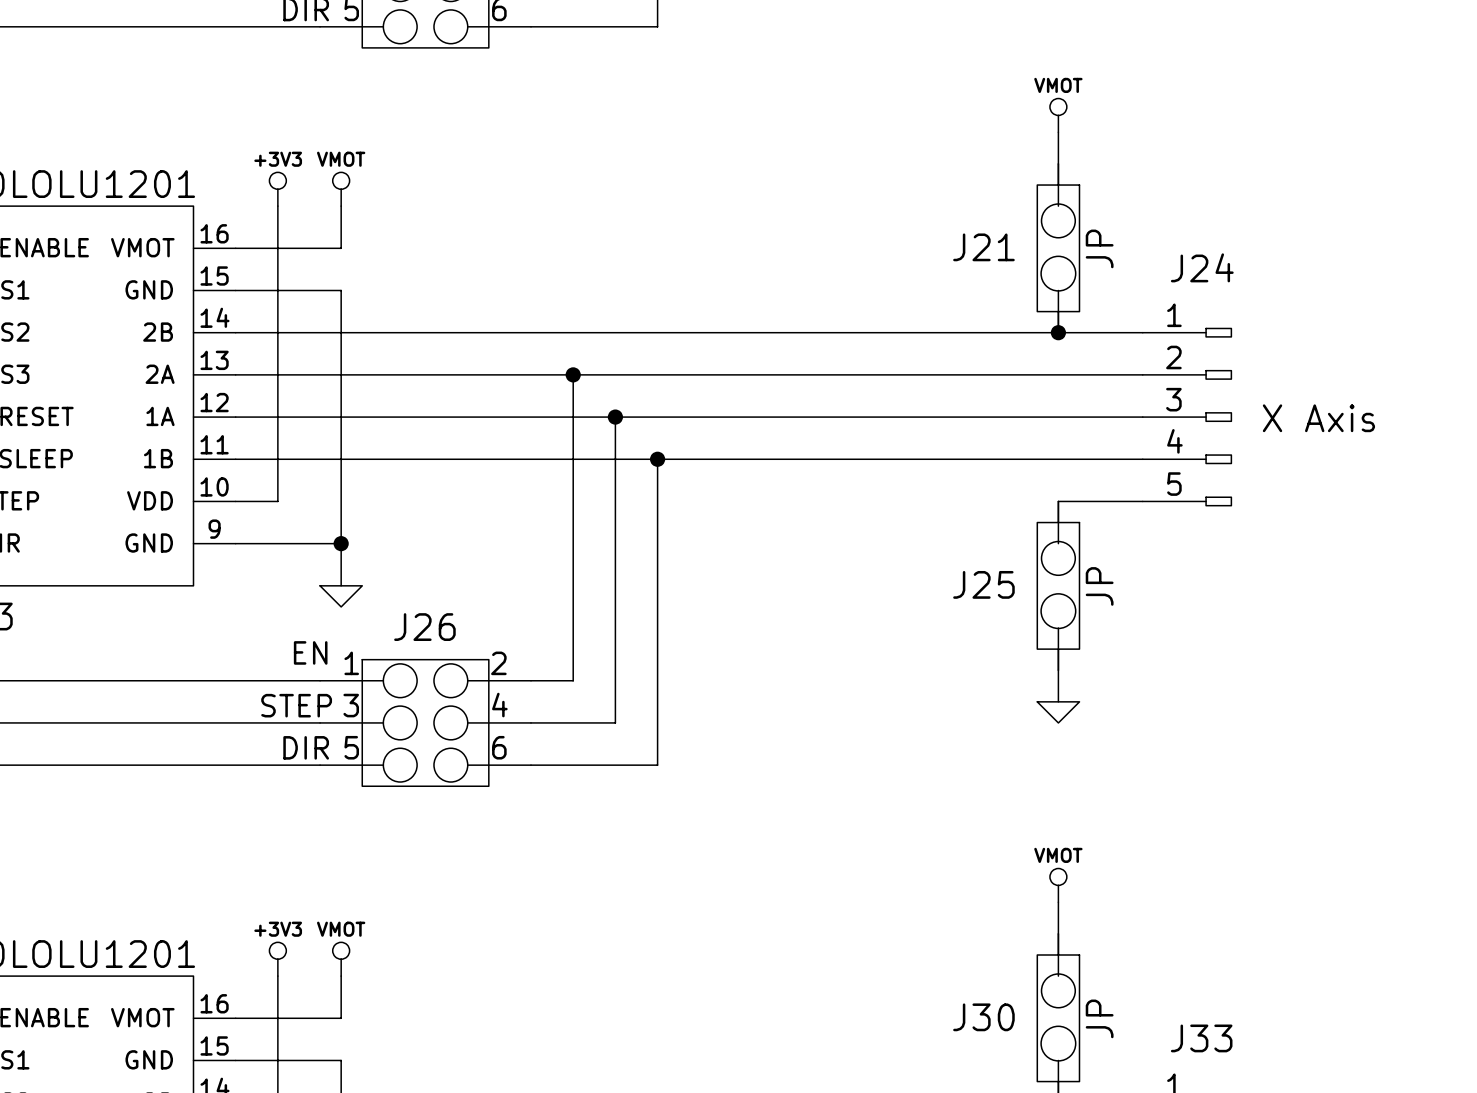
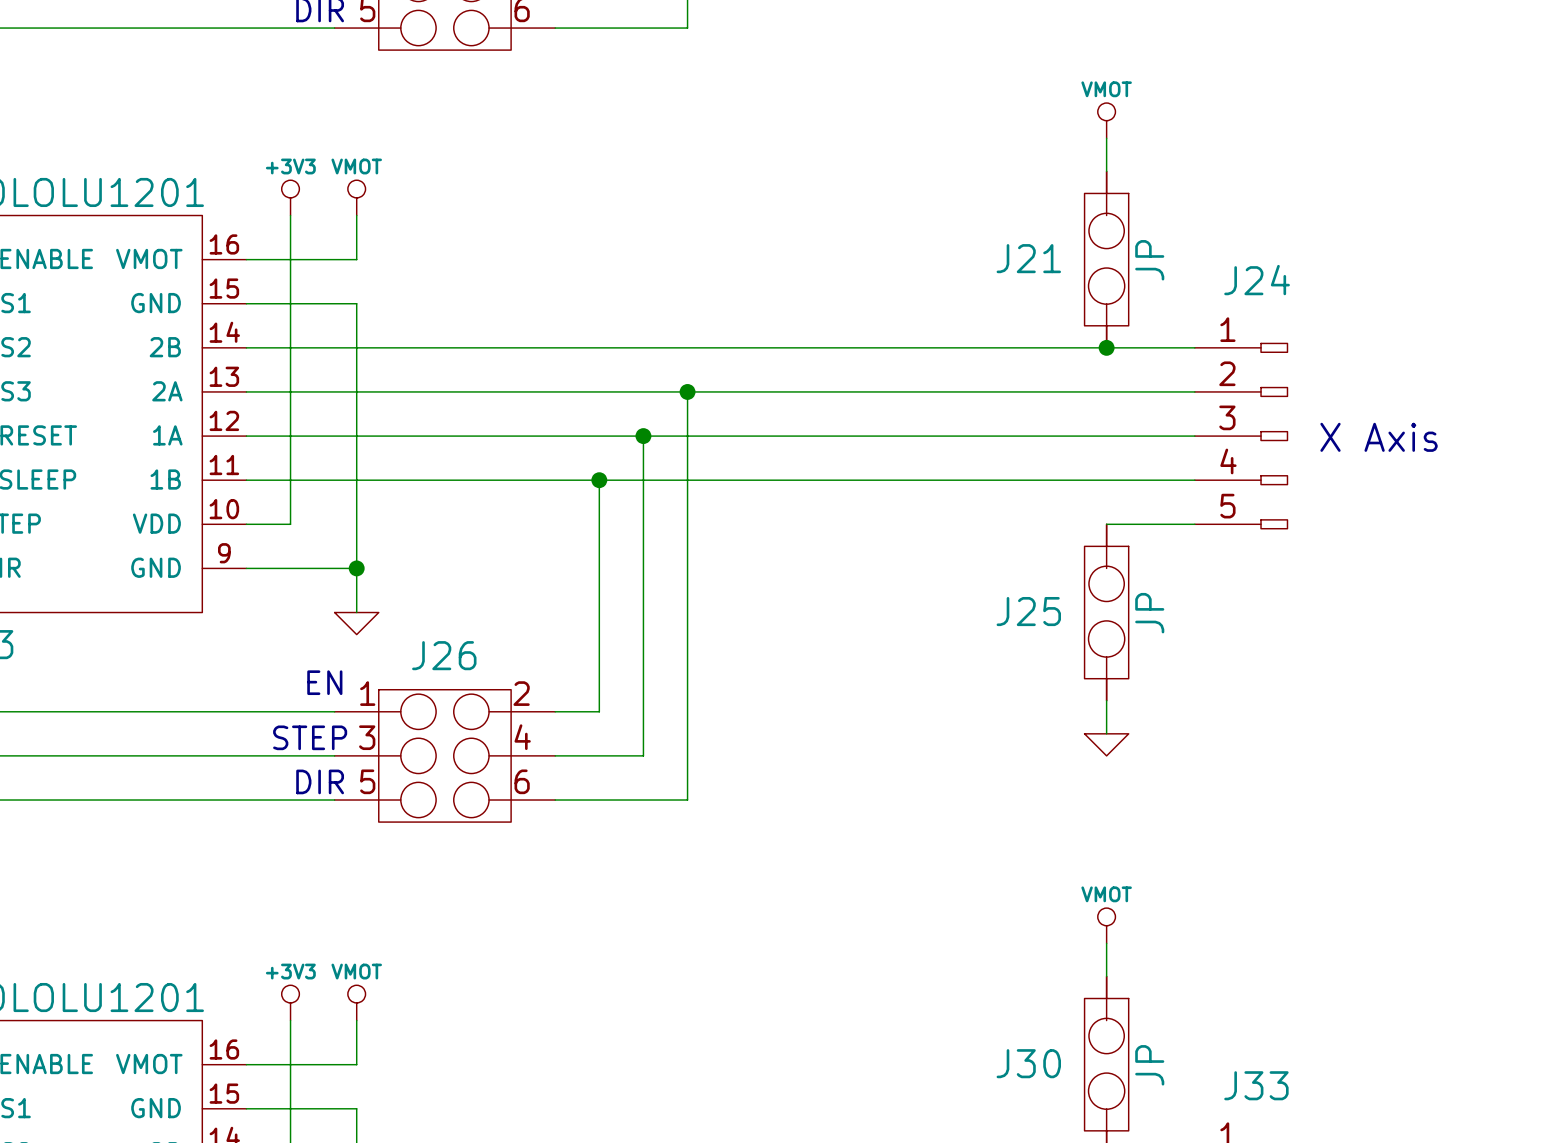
wire: (573, 374) (573, 459) -> (687, 391) (687, 480)
junction: (573, 374) -> none
junction: none -> (687, 391)
junction: none -> (599, 480)
junction: (657, 459) -> none

